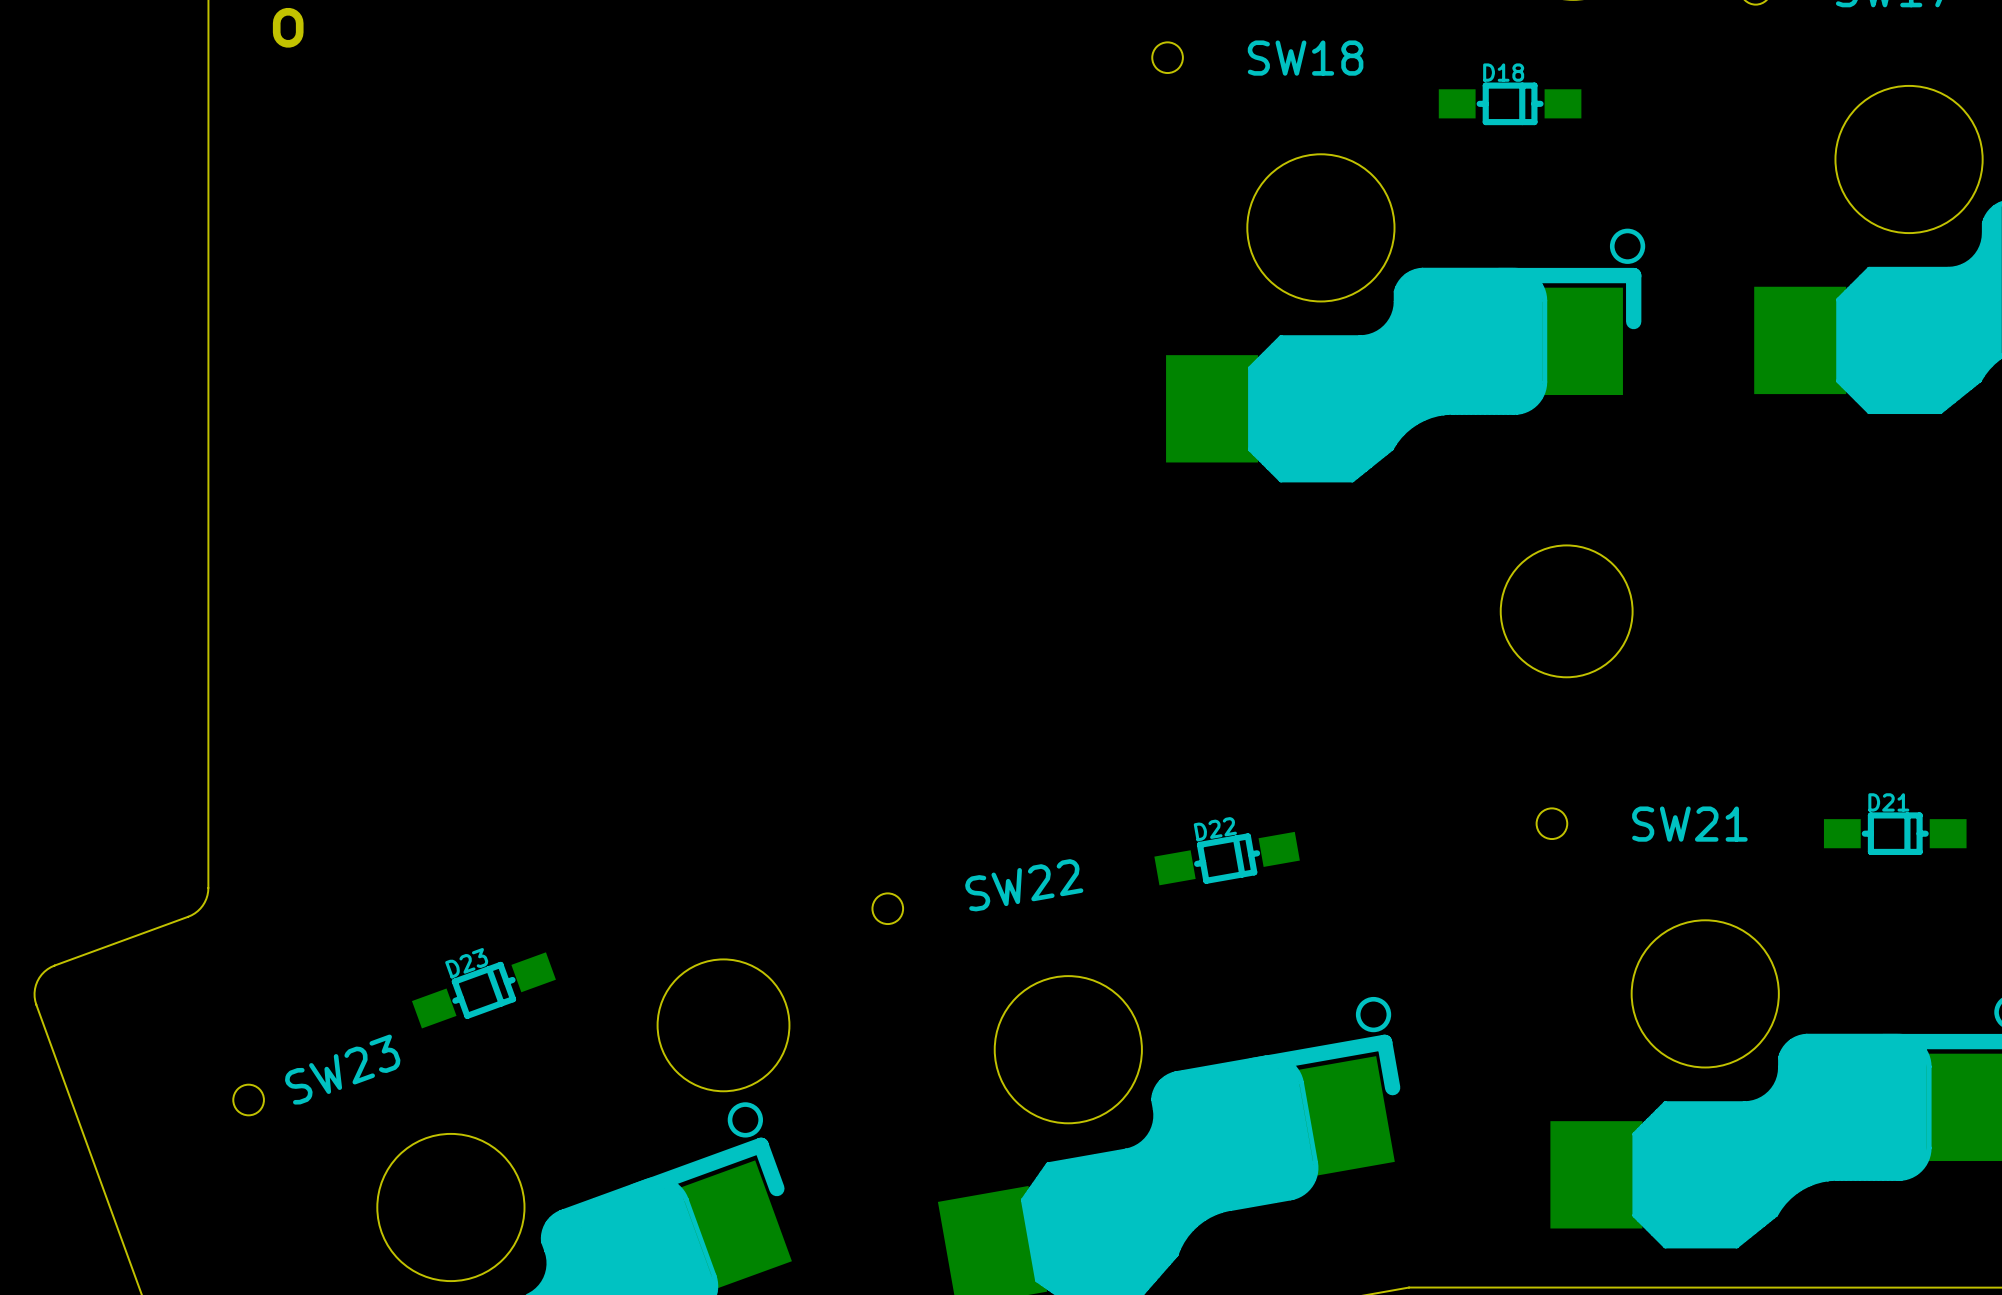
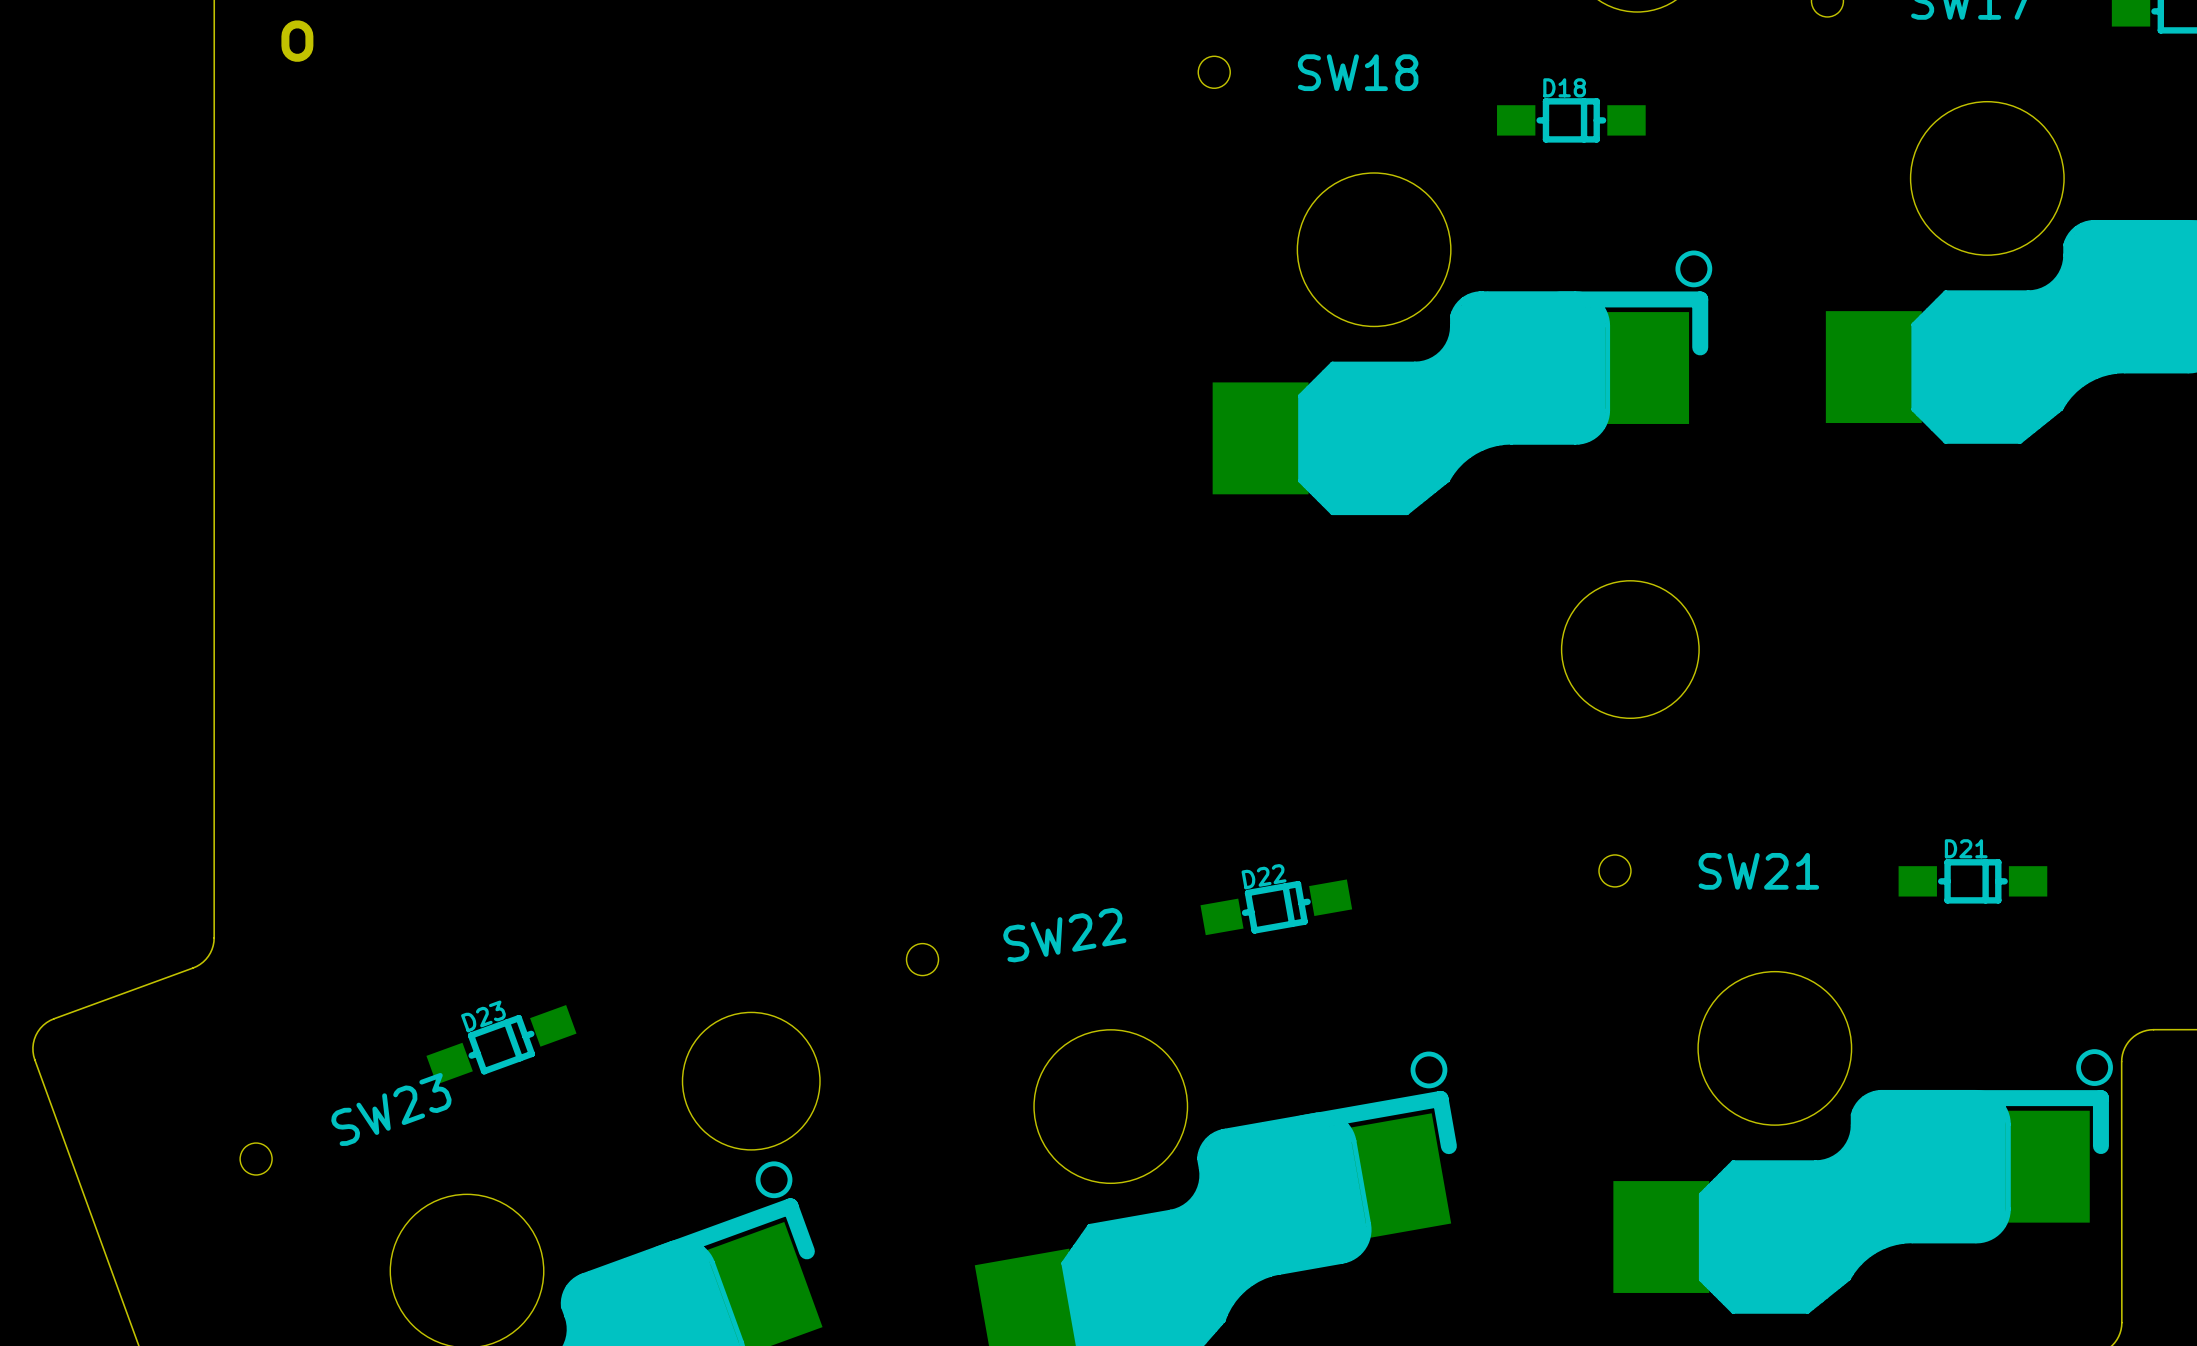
SW23 name position: SW23 (342, 1069) -> SW23 (391, 1109)

